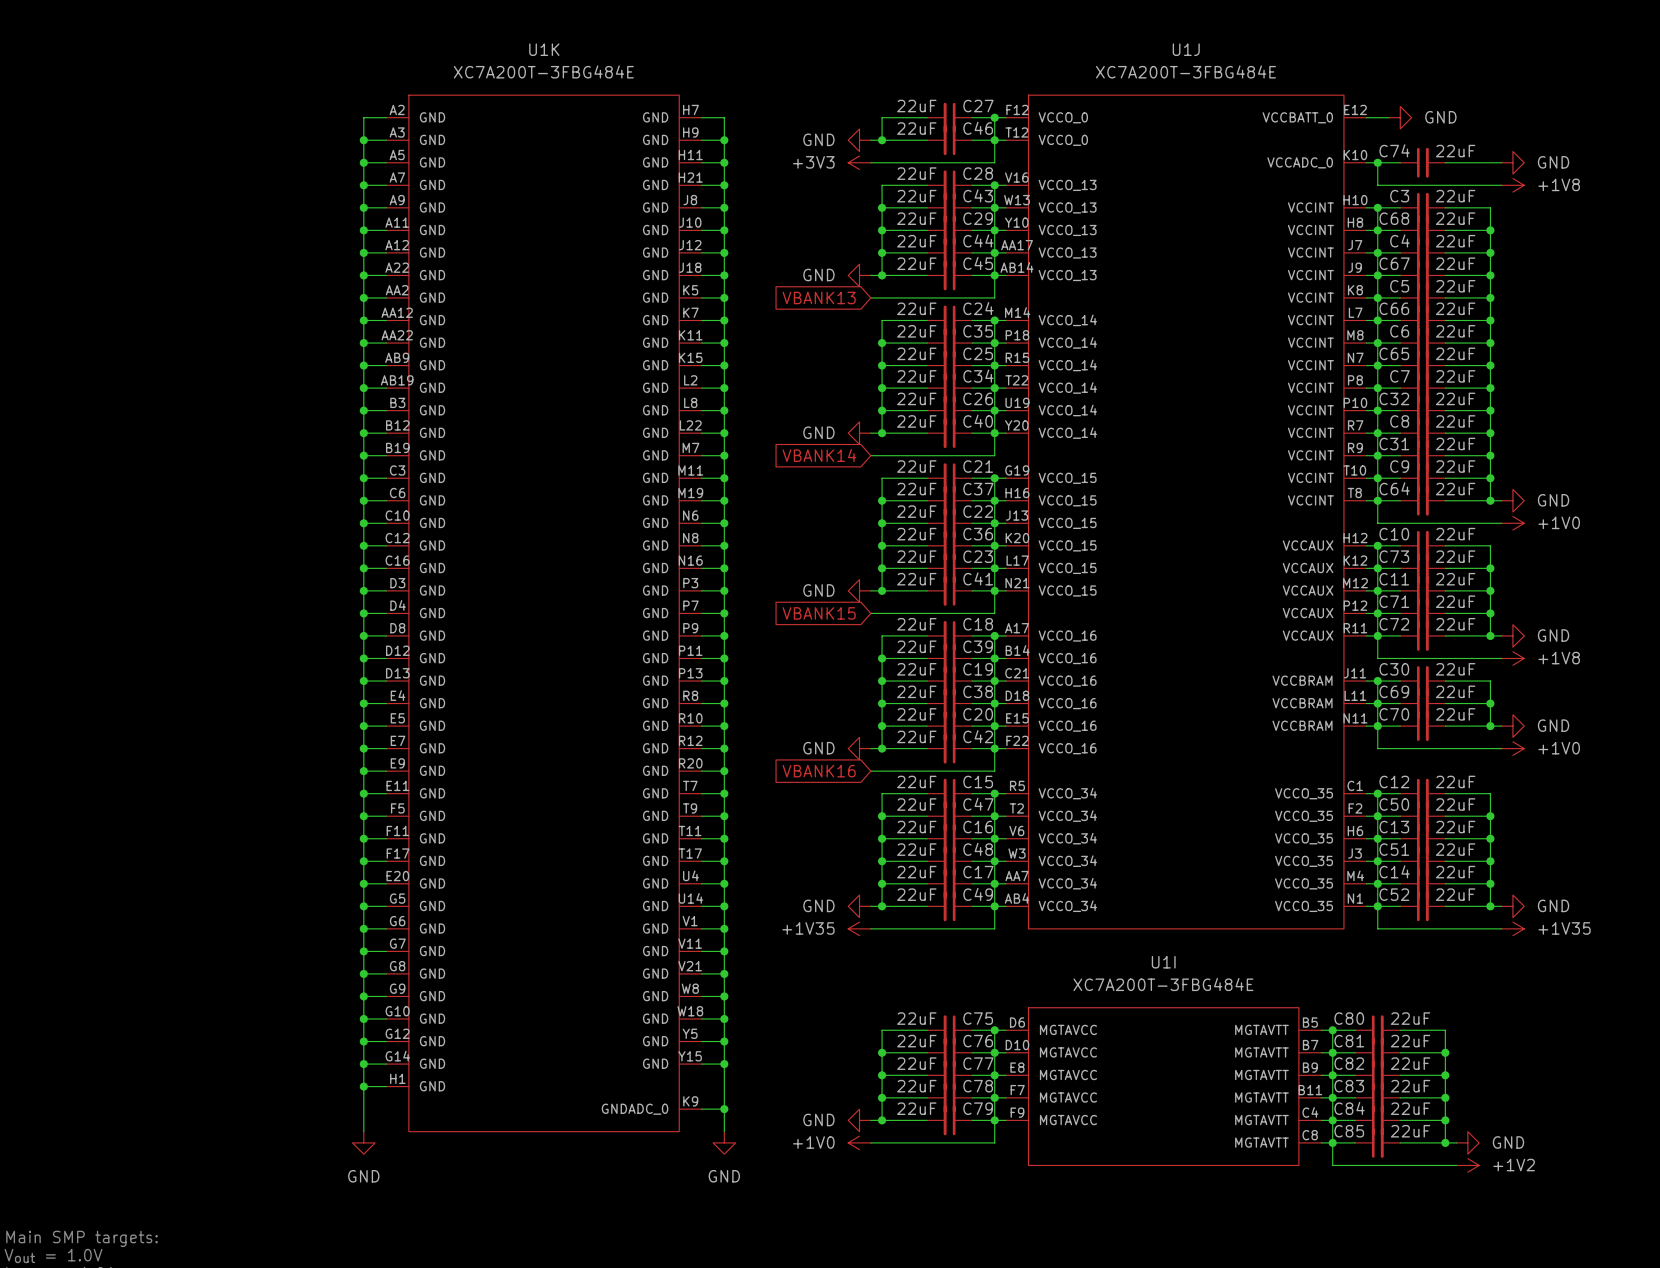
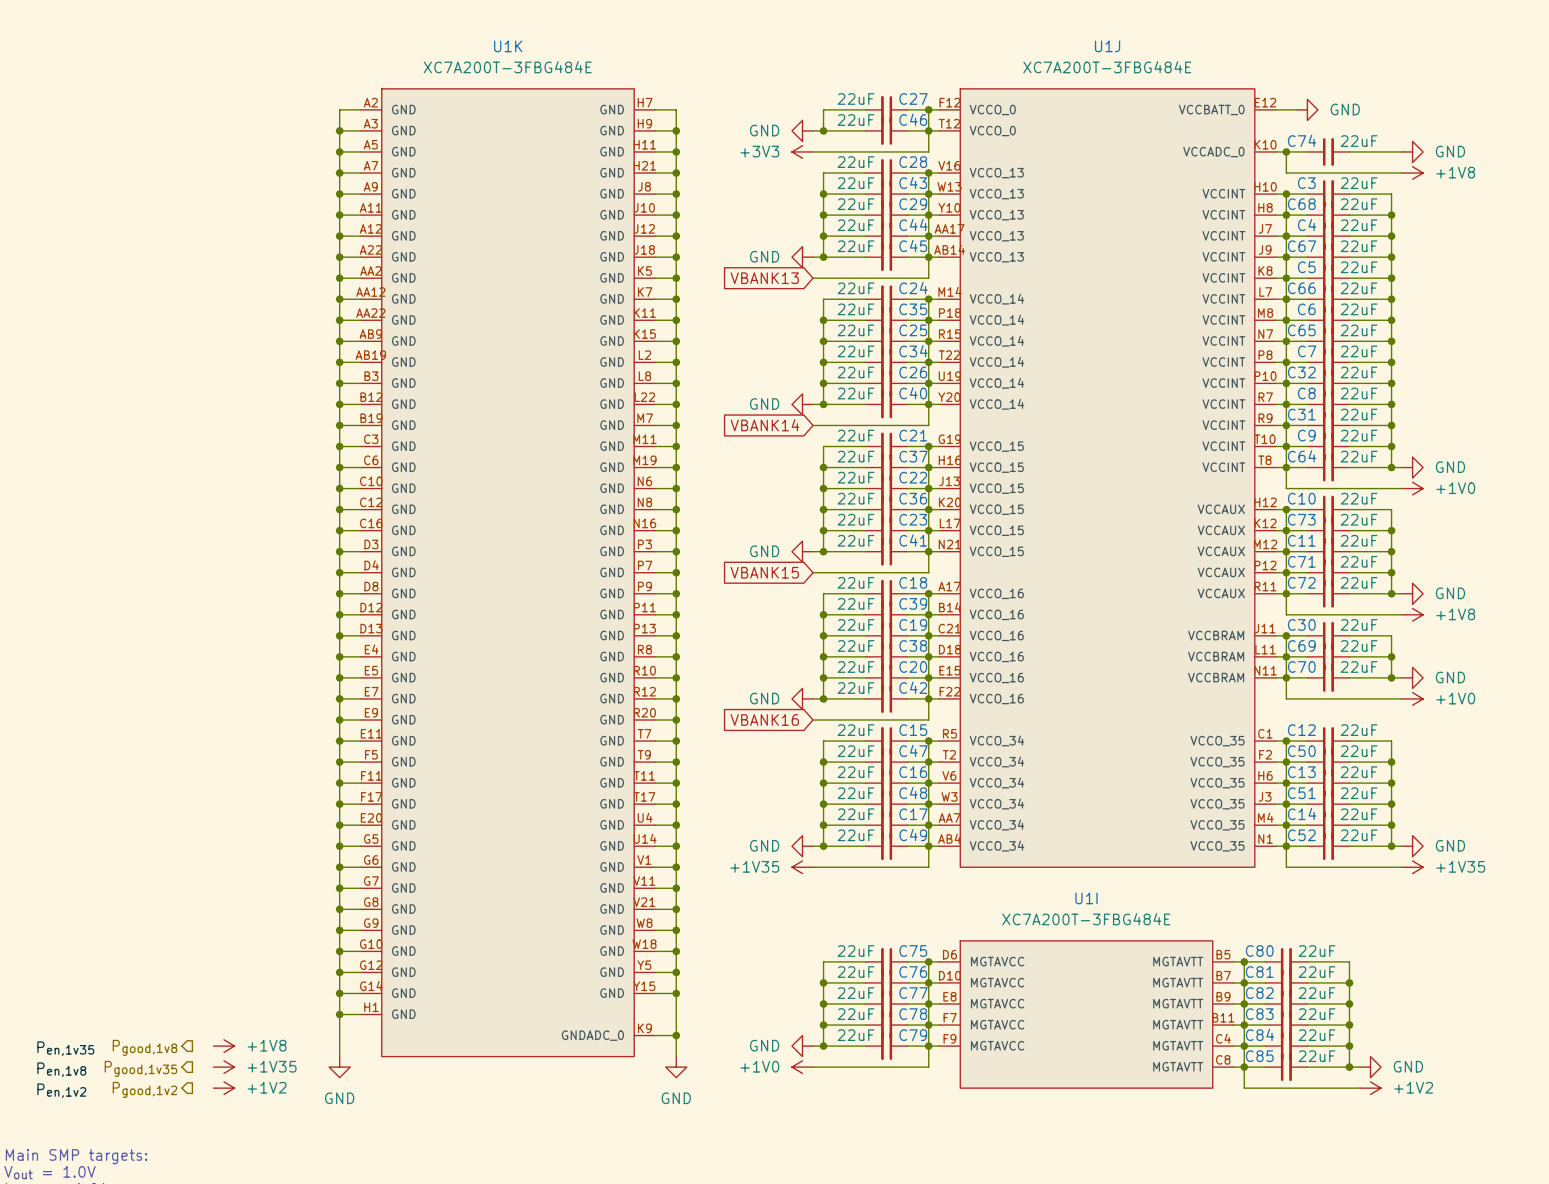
power symbol: none -> +1V8 (223, 1046)
hierarchical label: none -> Pgood,1v8 (144, 1047)
label: none -> Pen,1v35 (65, 1048)
power symbol: none -> +1V35 (223, 1067)
hierarchical label: none -> Pgood,1v35 (140, 1068)
label: none -> Pen,1v8 (61, 1069)
power symbol: none -> +1V2 (223, 1088)
hierarchical label: none -> Pgood,1v2 (144, 1089)
label: none -> Pen,1v2 (61, 1090)

